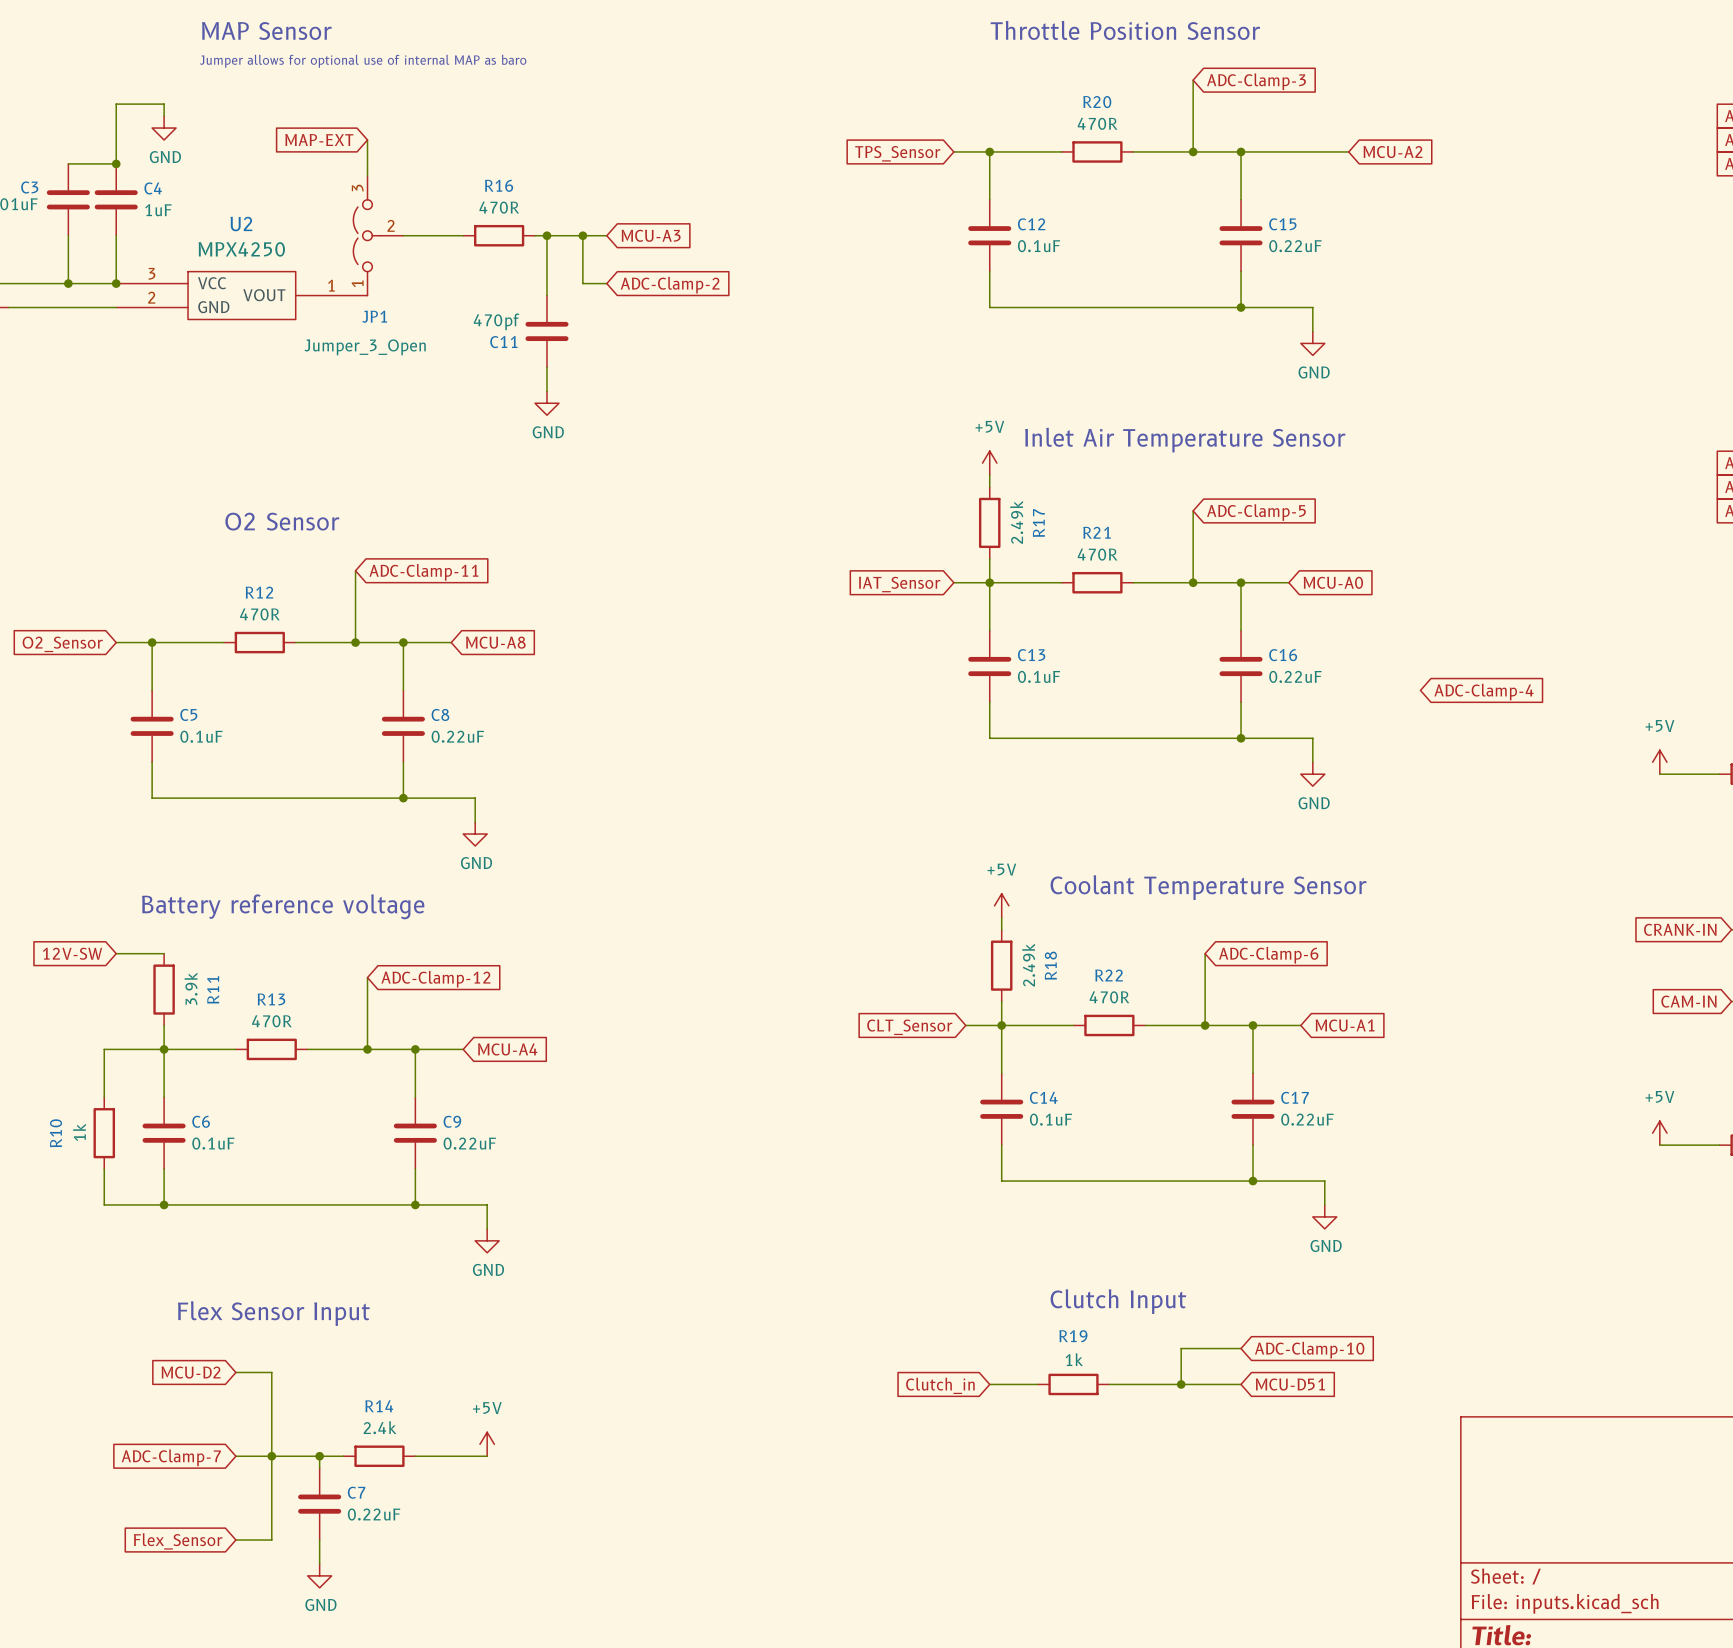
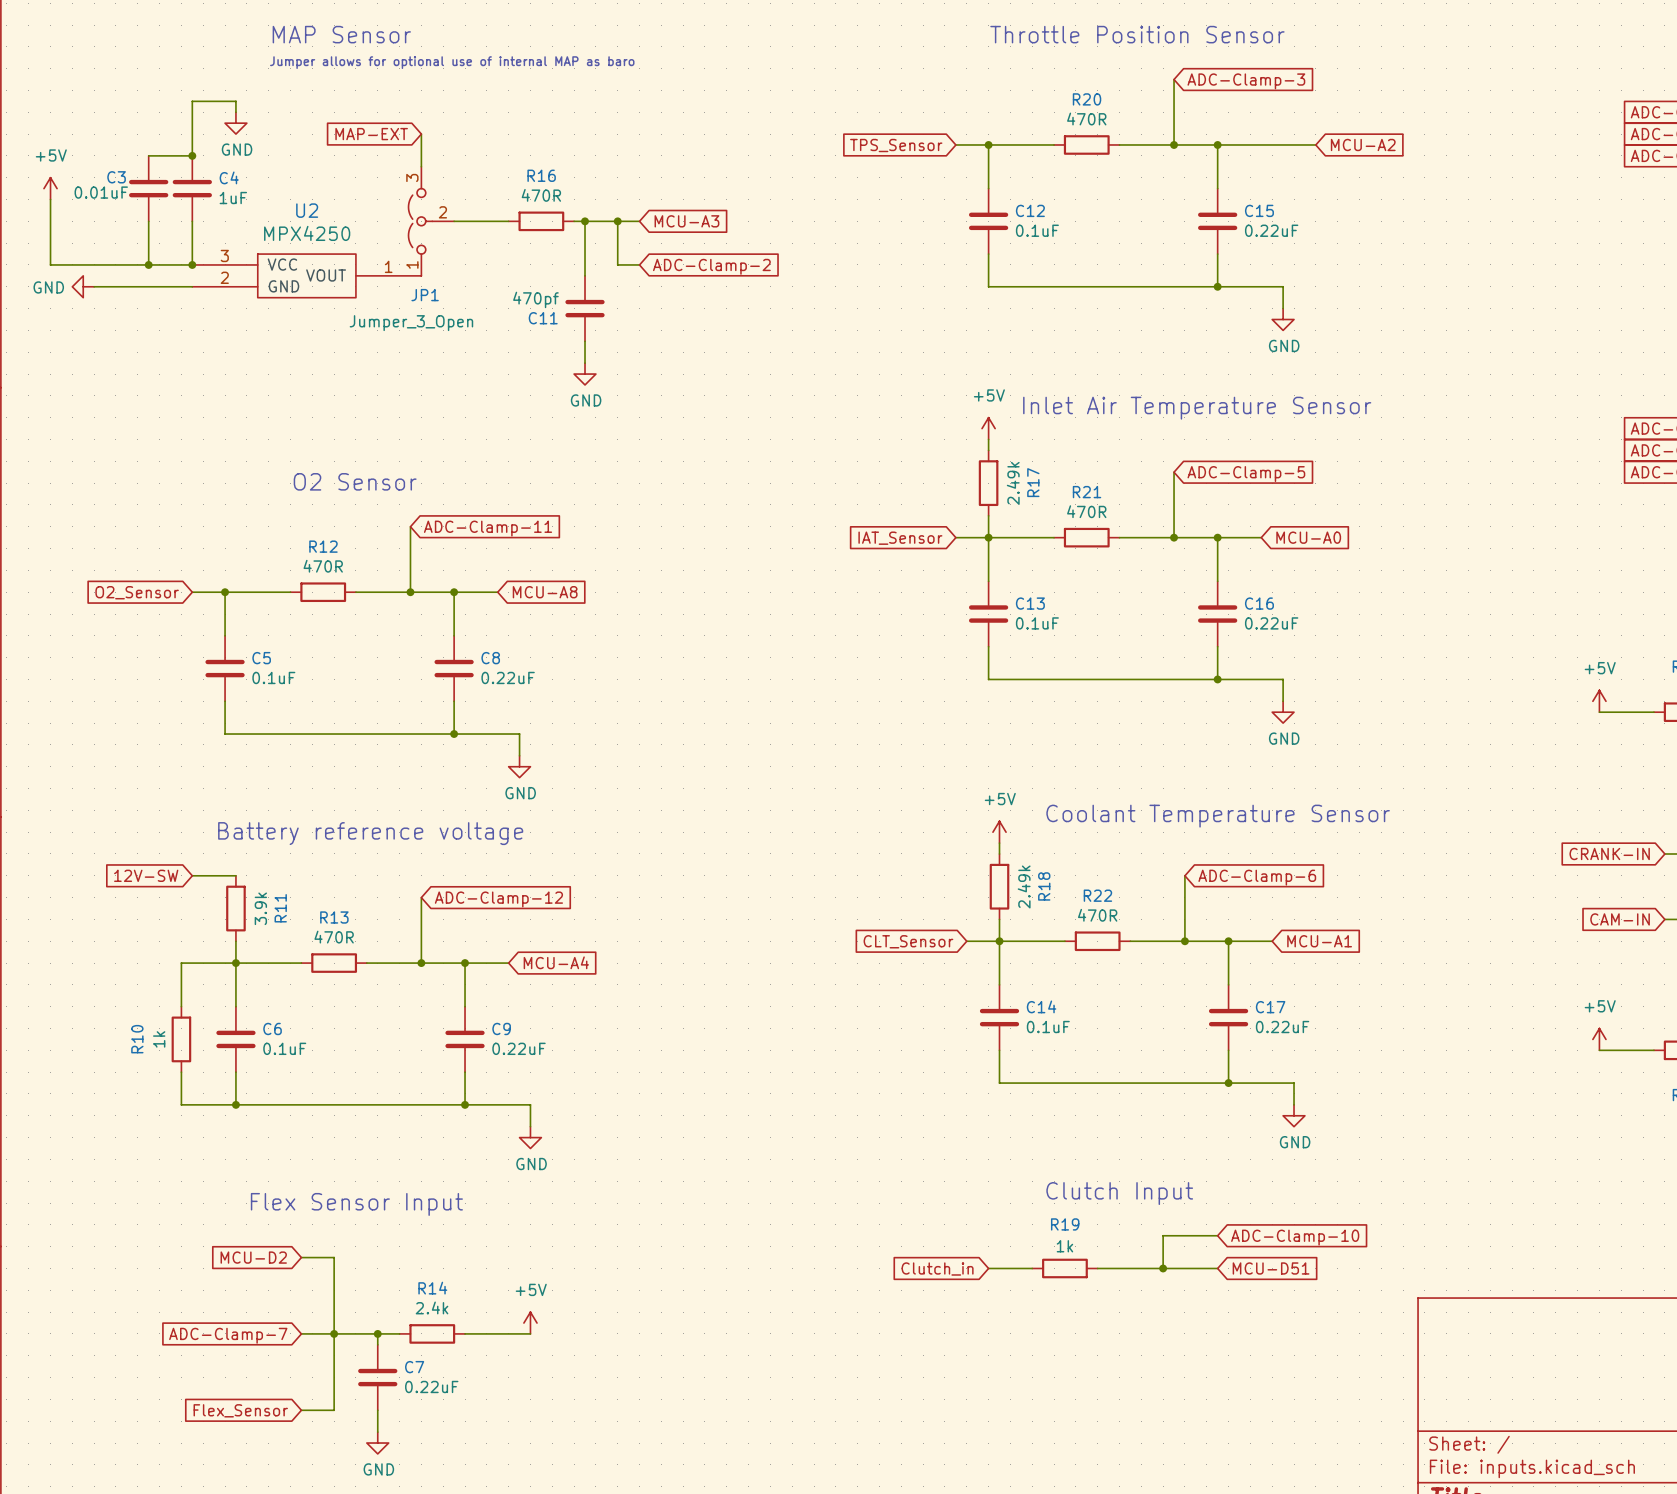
global label: ADC-Clamp-4 (1484, 692) -> none

